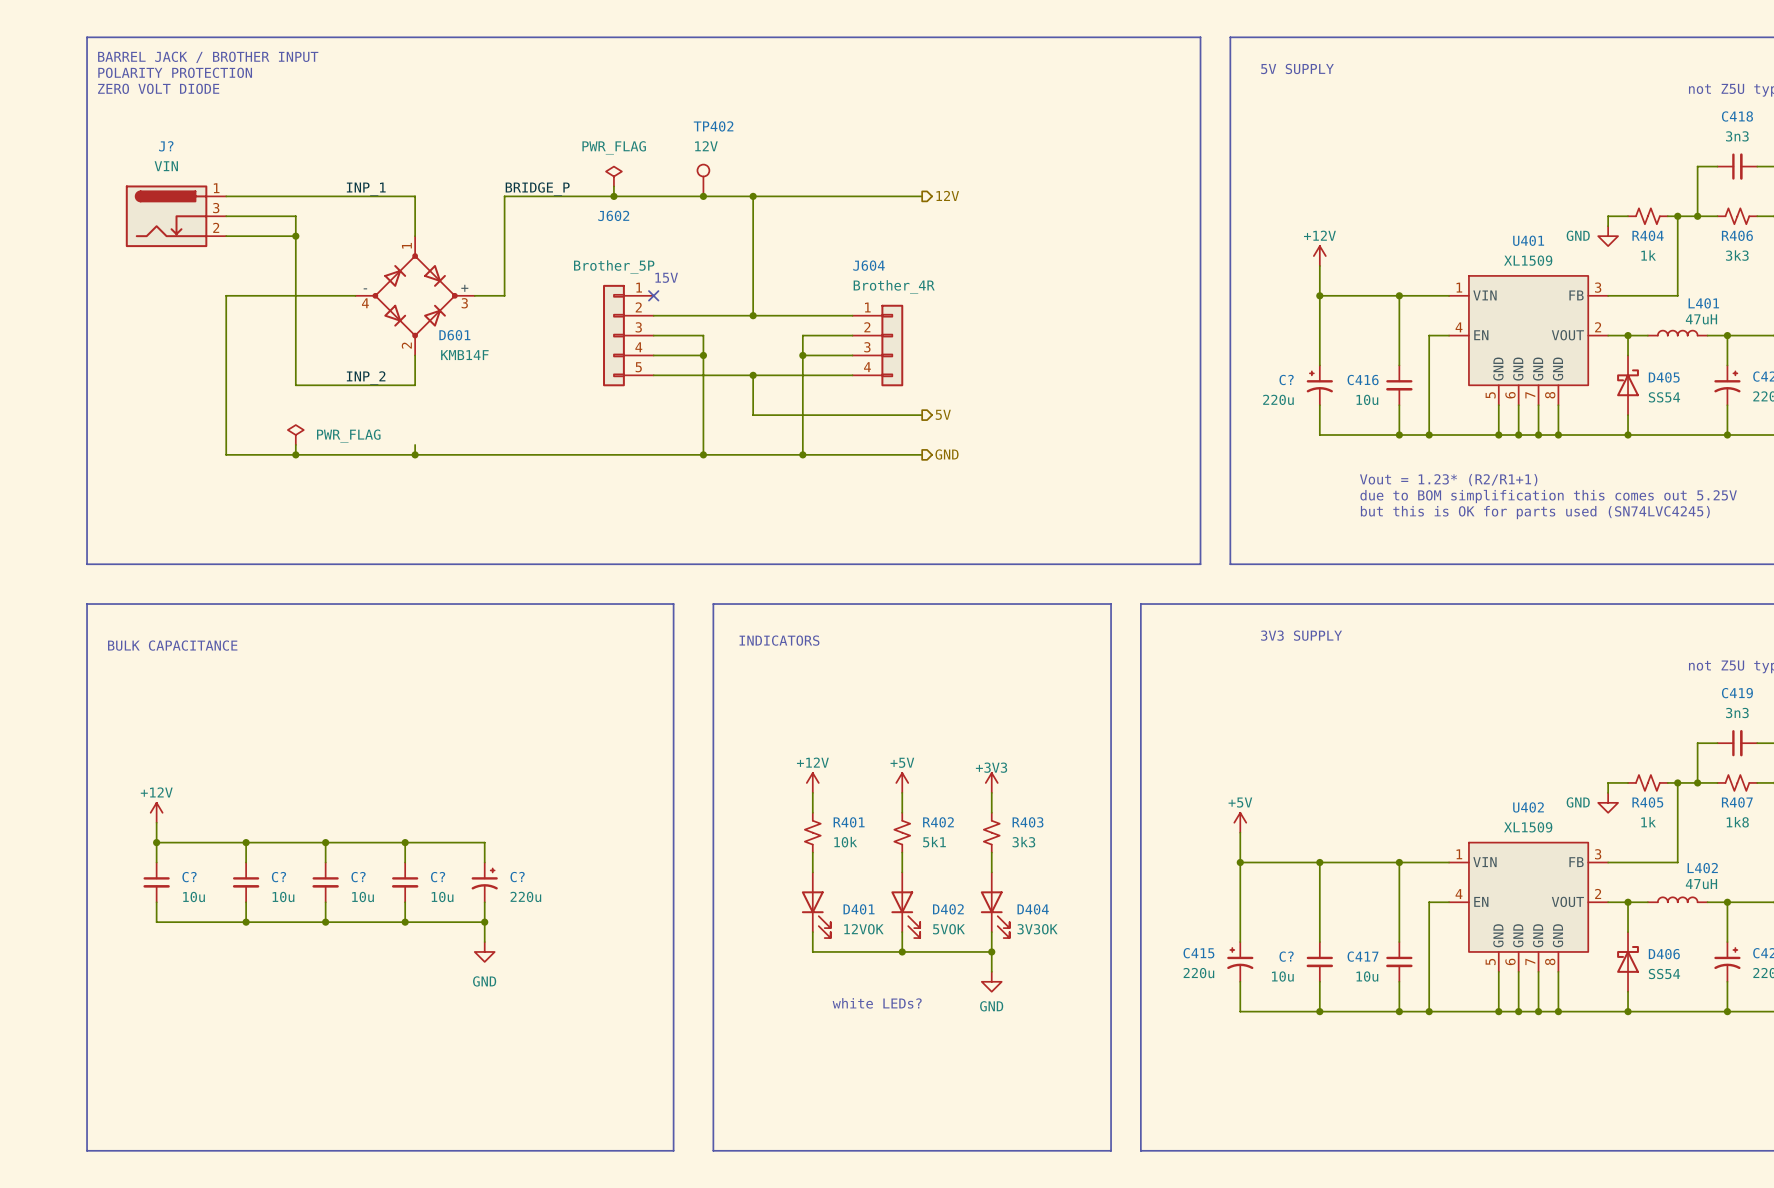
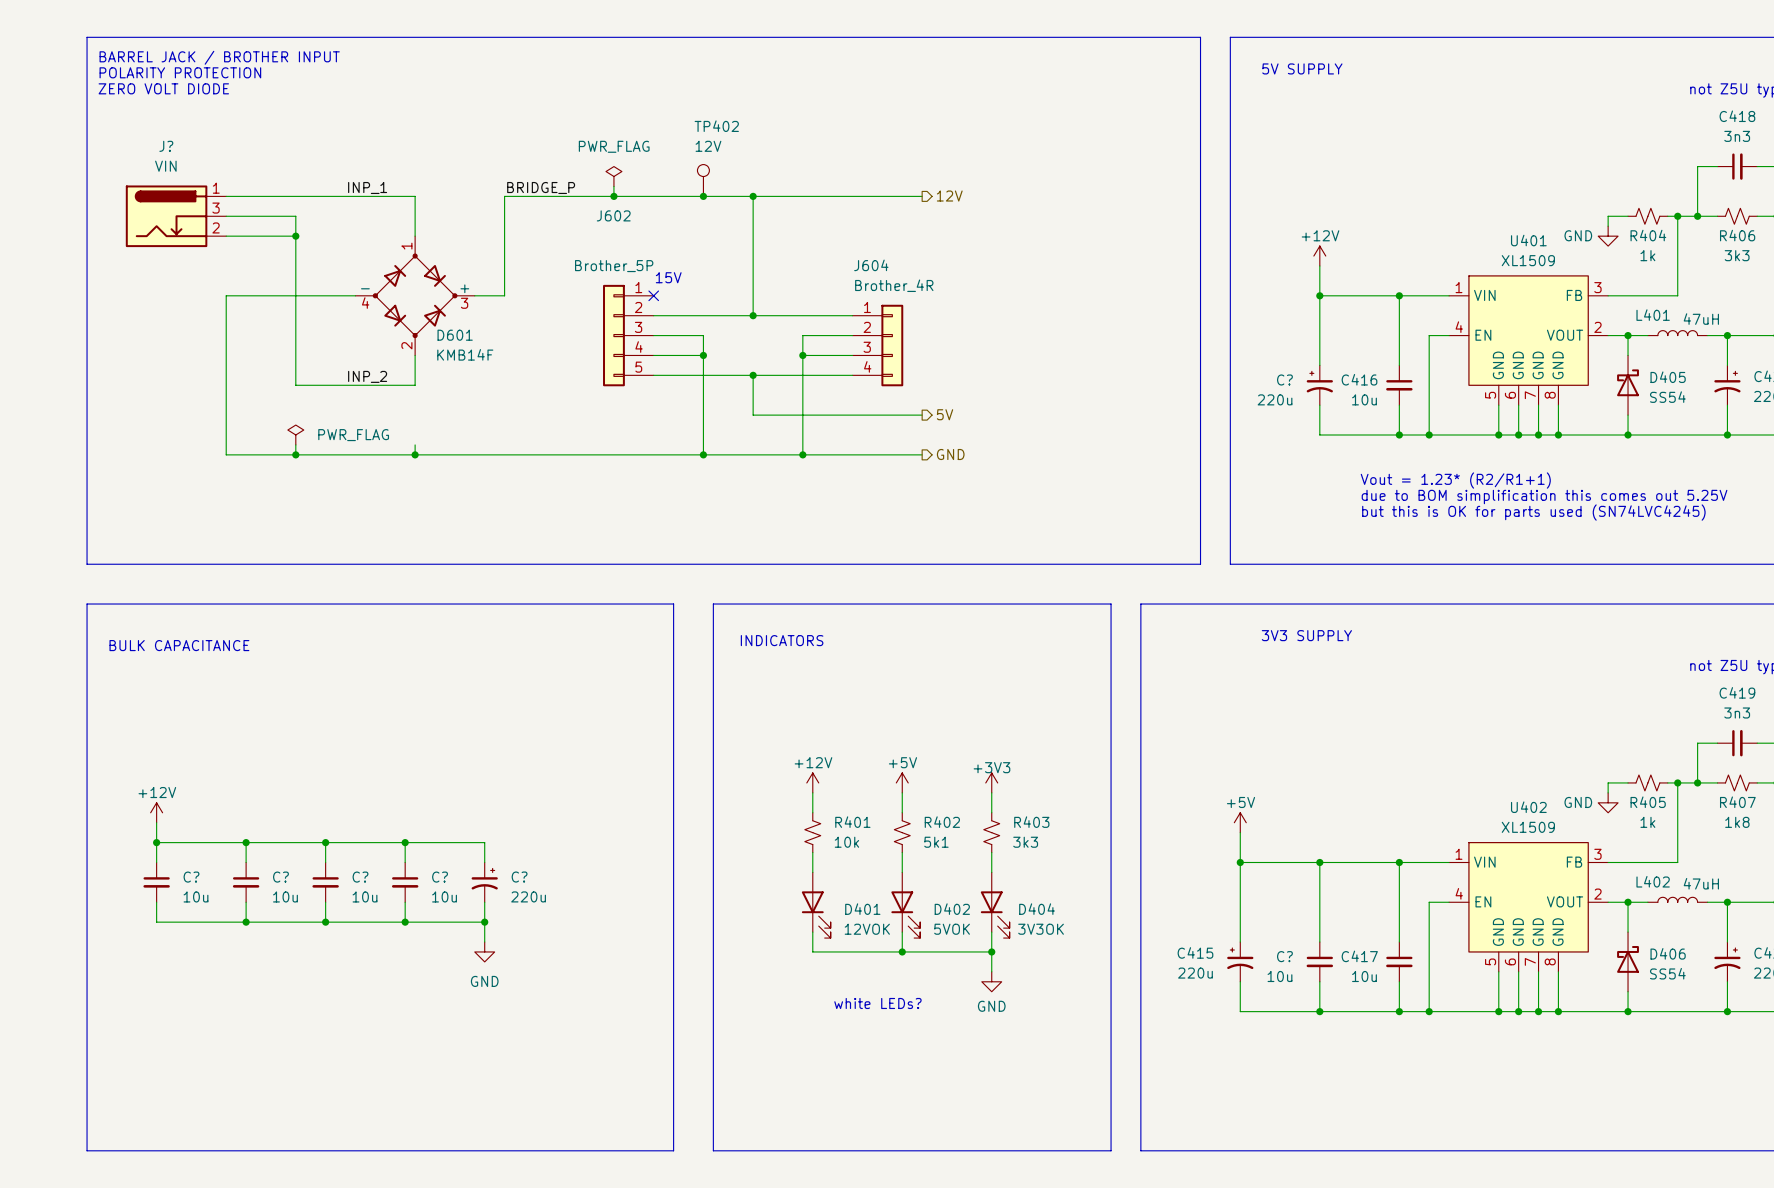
L401 name position: L401 (1703, 303) -> L401 (1653, 315)
L402 name position: L402 (1702, 868) -> L402 (1653, 881)

